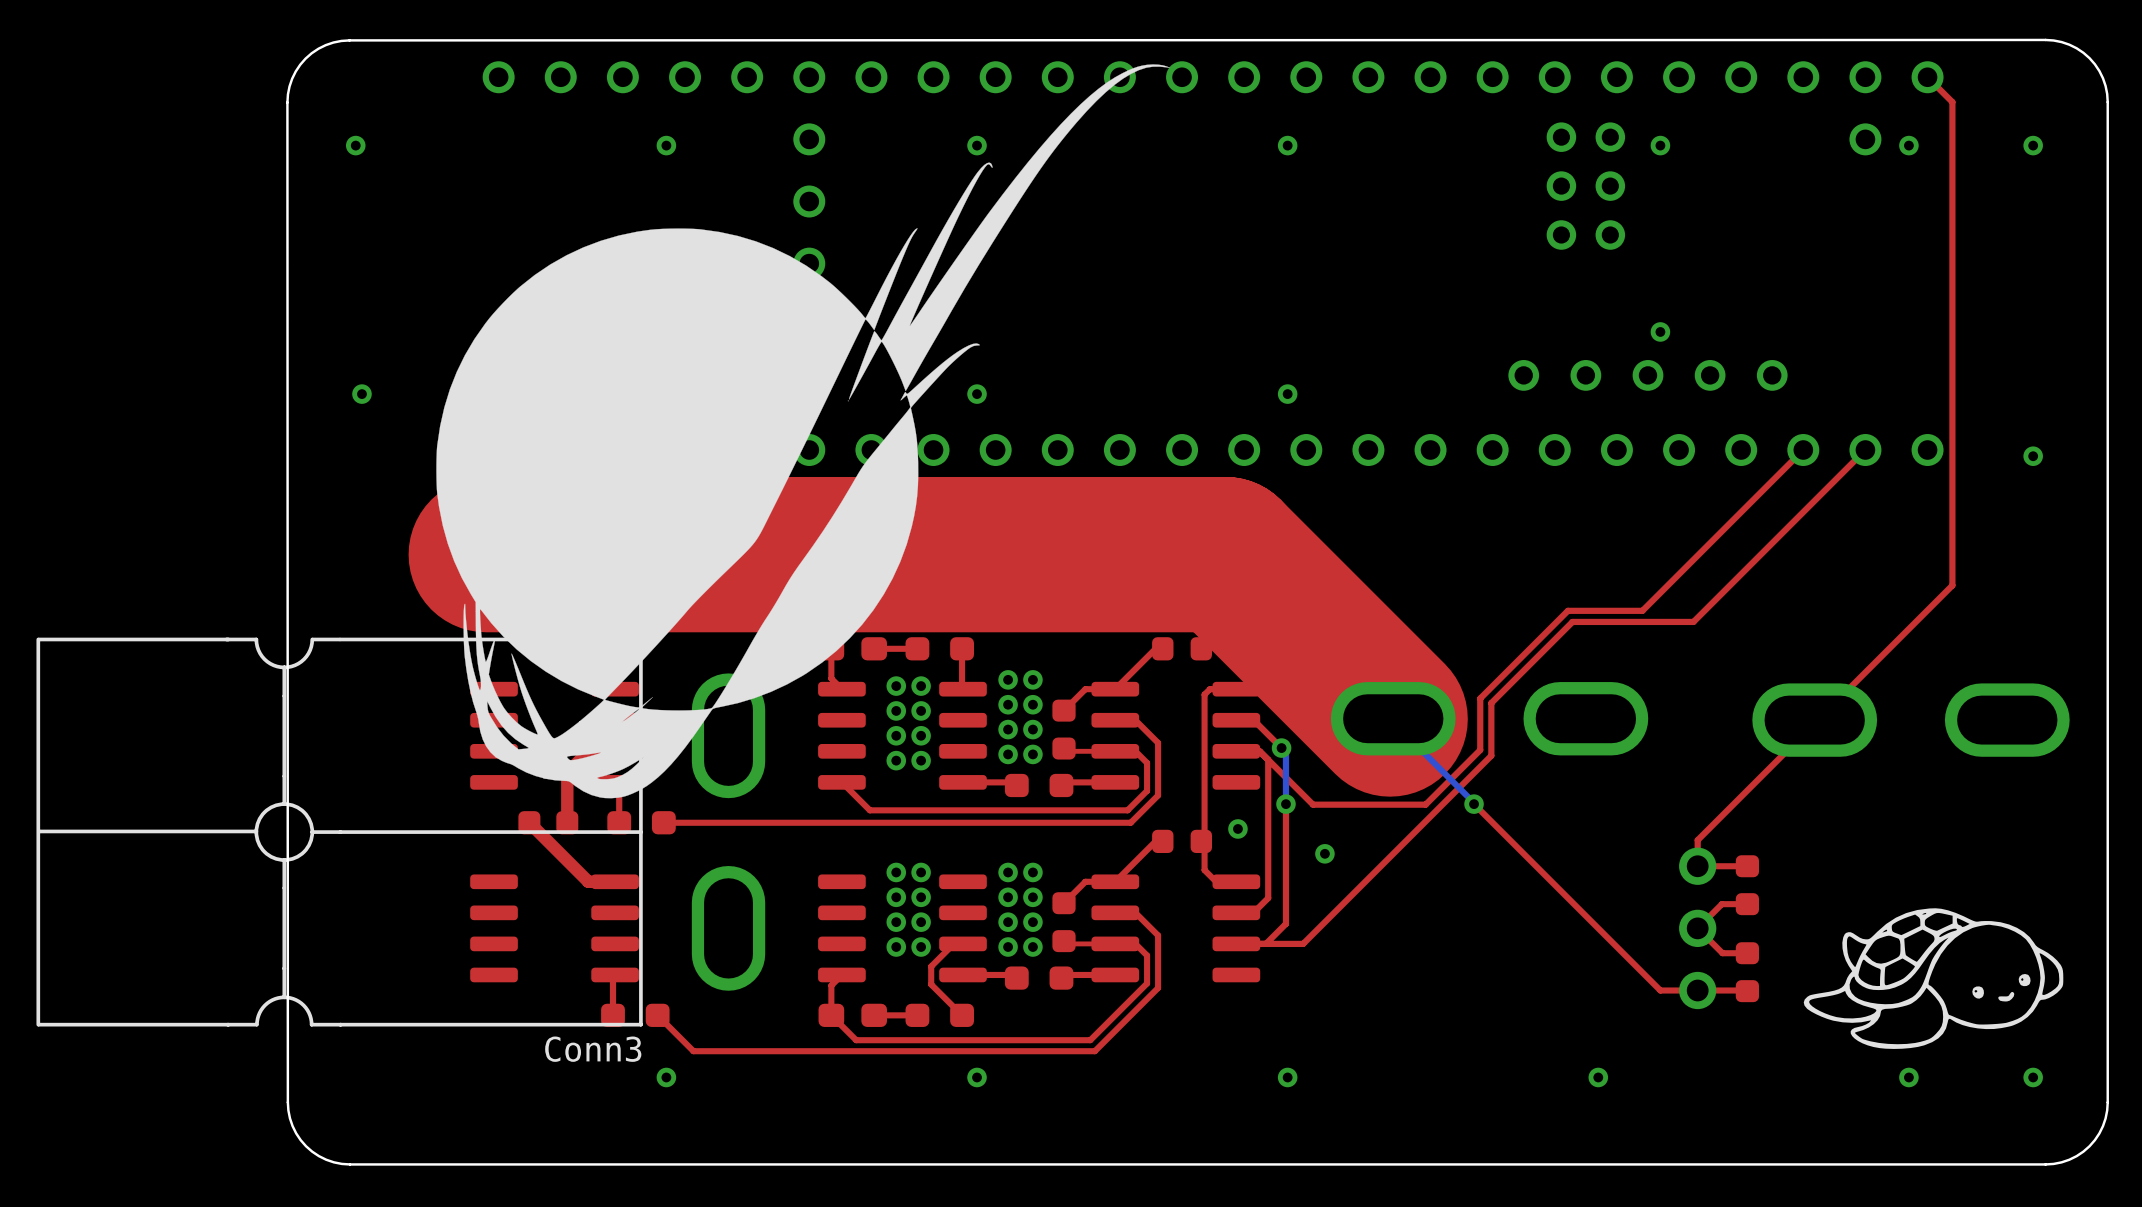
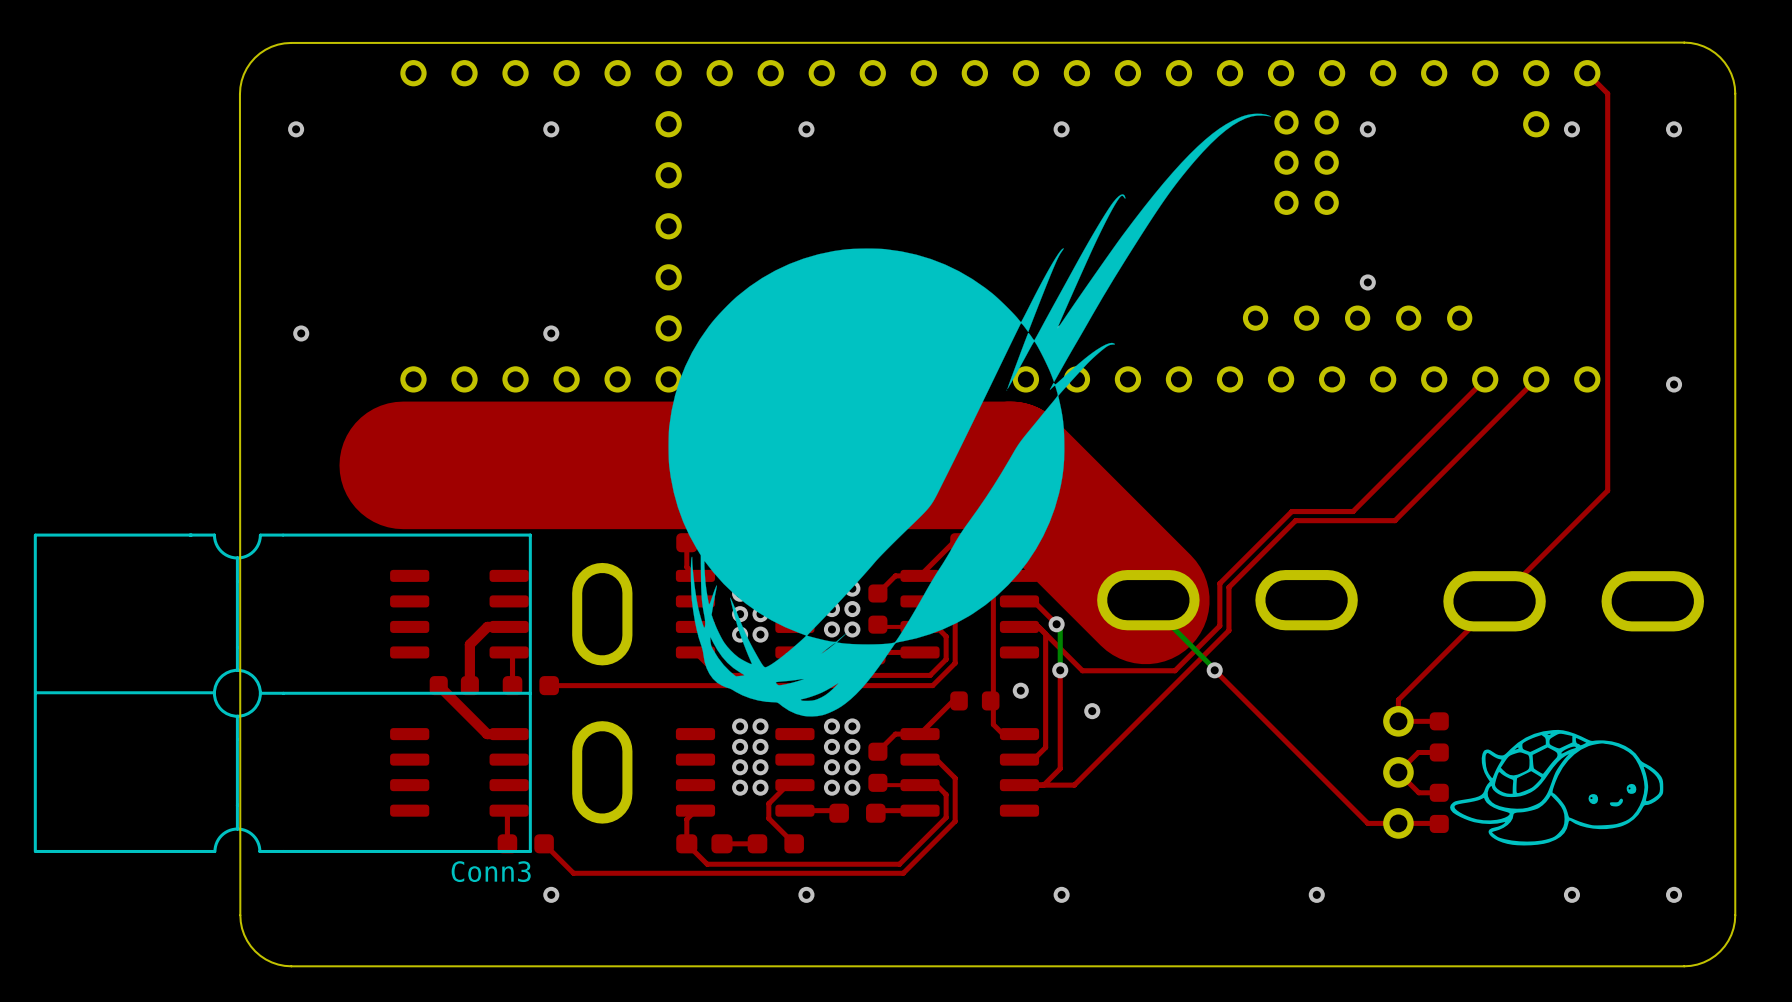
drawing position: (803, 431) -> (969, 415)
drawing position: (1933, 978) -> (1556, 787)

